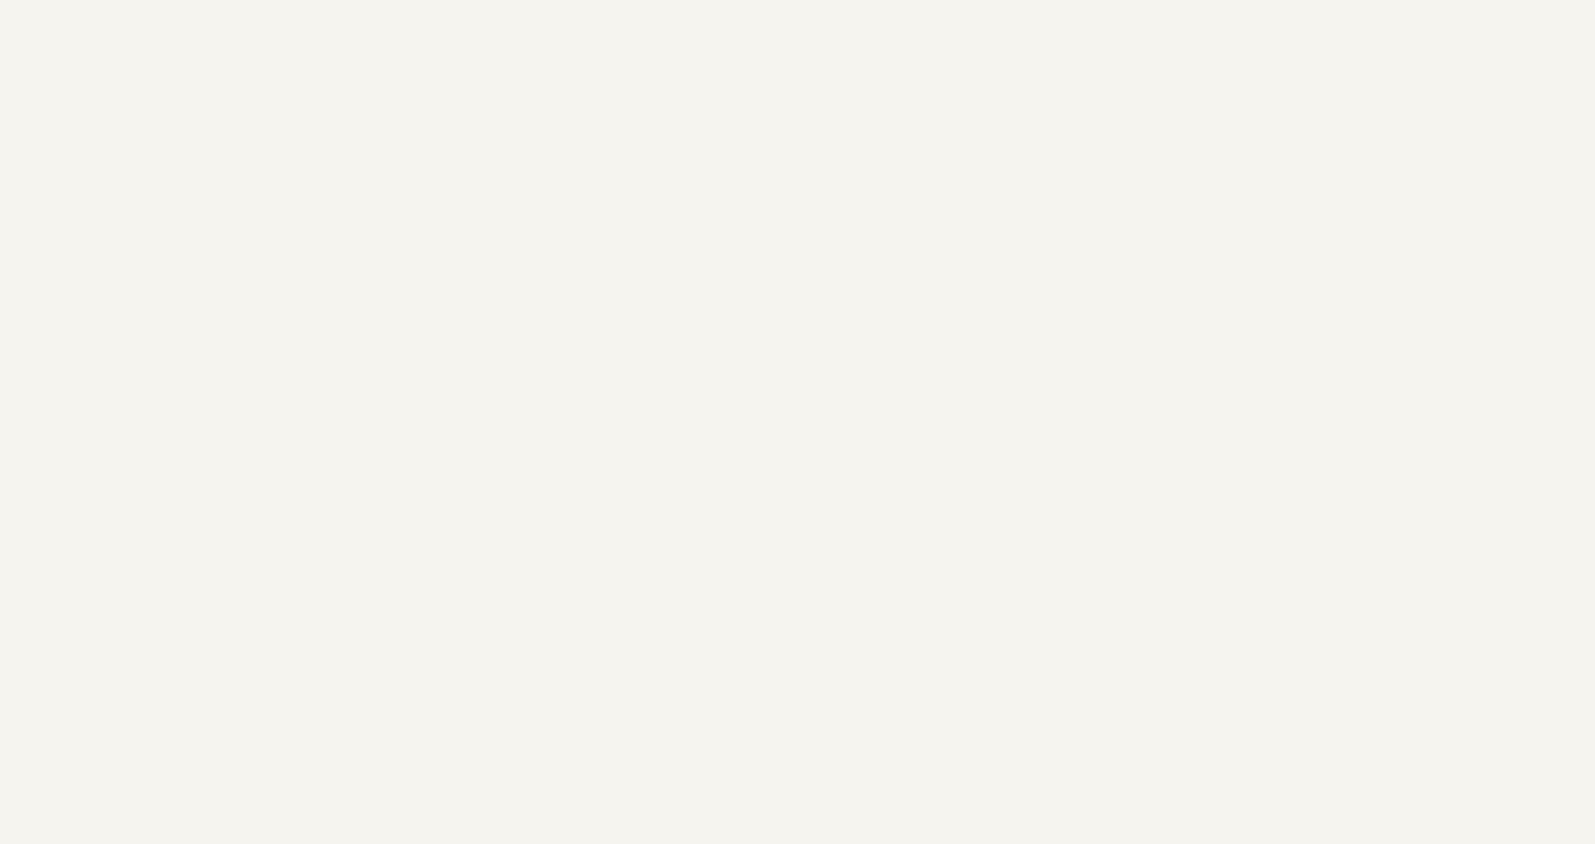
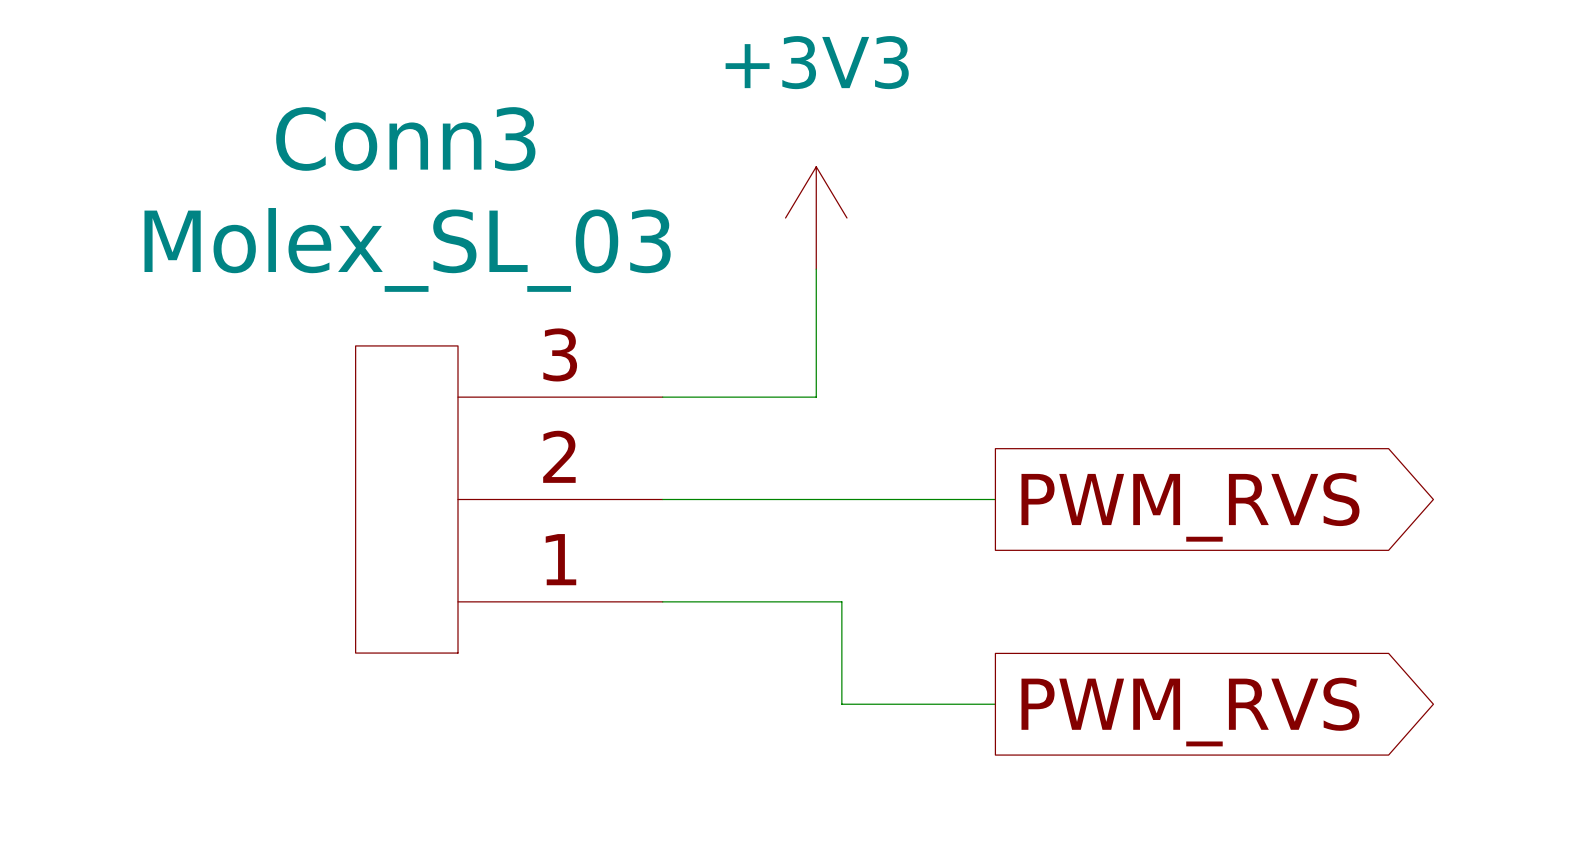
power symbol: none -> +3V3 (816, 218)
wire: none -> (816, 269) (816, 397) (662, 397)
Conn3: none -> Molex_SL_03 (509, 499)
wire: none -> (662, 499) (995, 499)
global label: none -> PWM_RVS (1190, 507)
wire: none -> (662, 601) (841, 601) (841, 704) (995, 704)
global label: none -> PWM_RVS (1190, 712)

